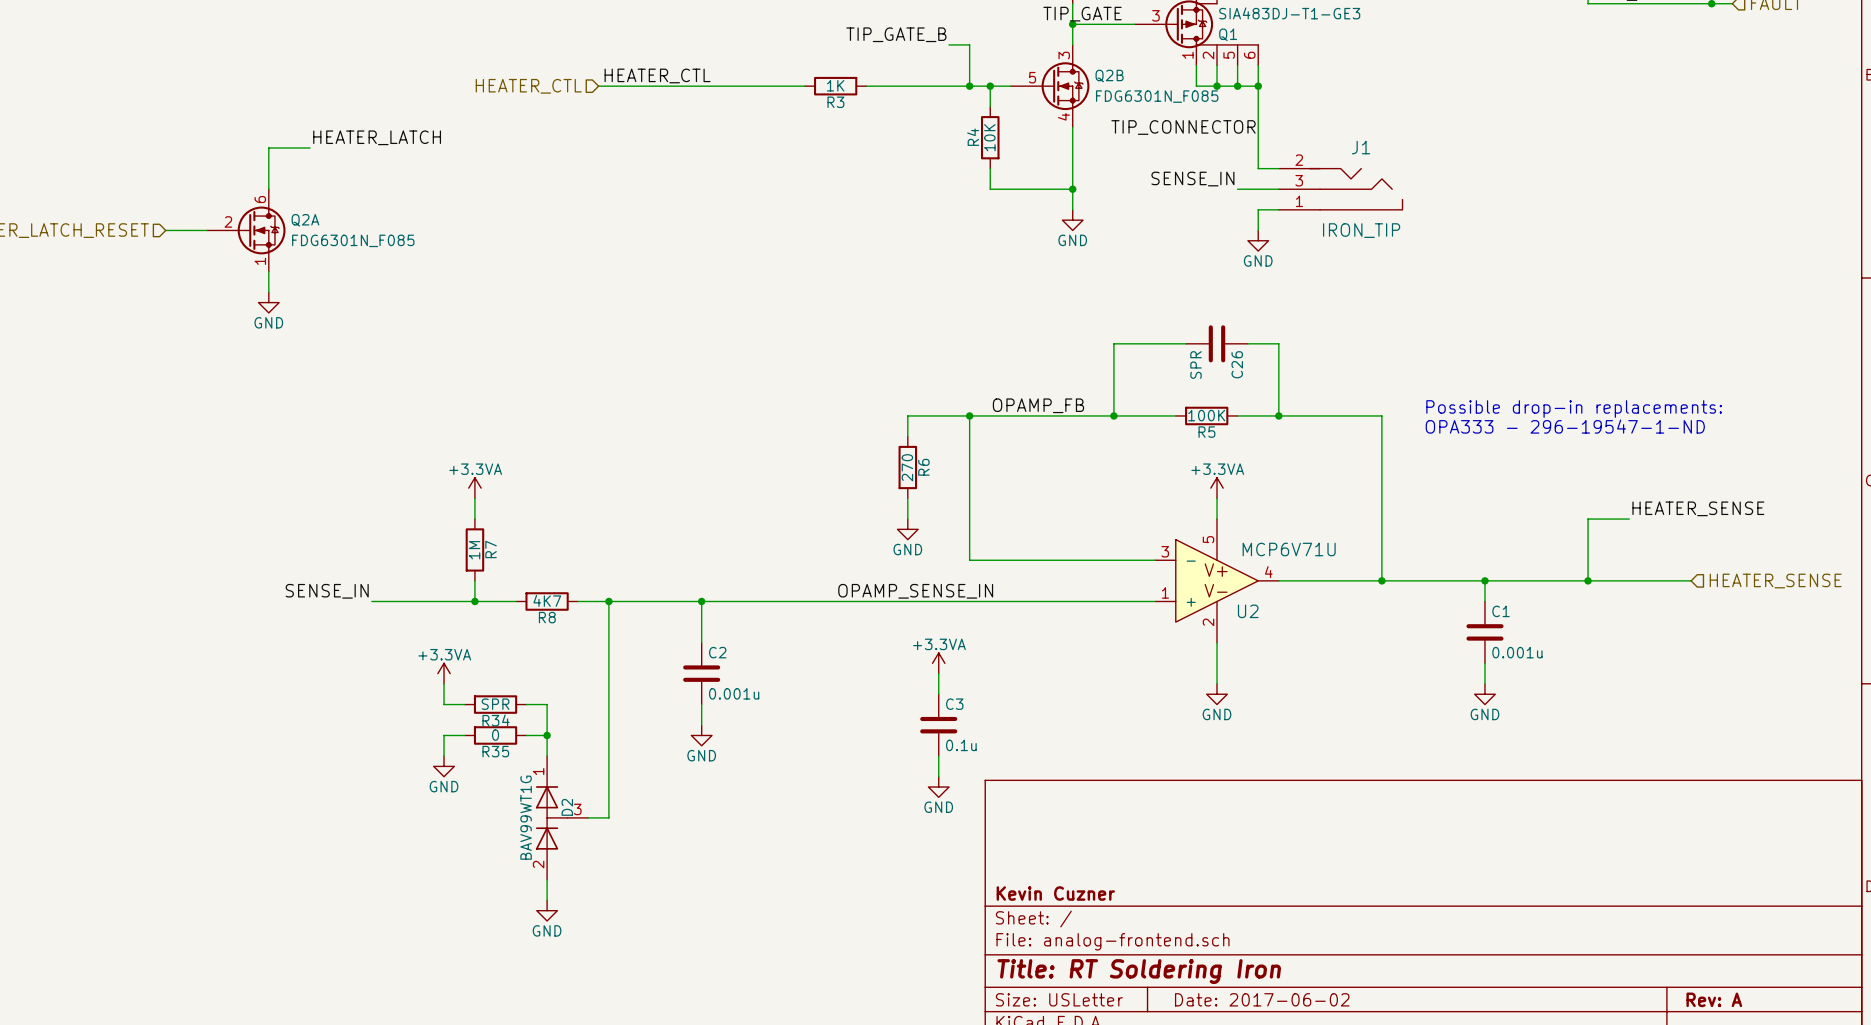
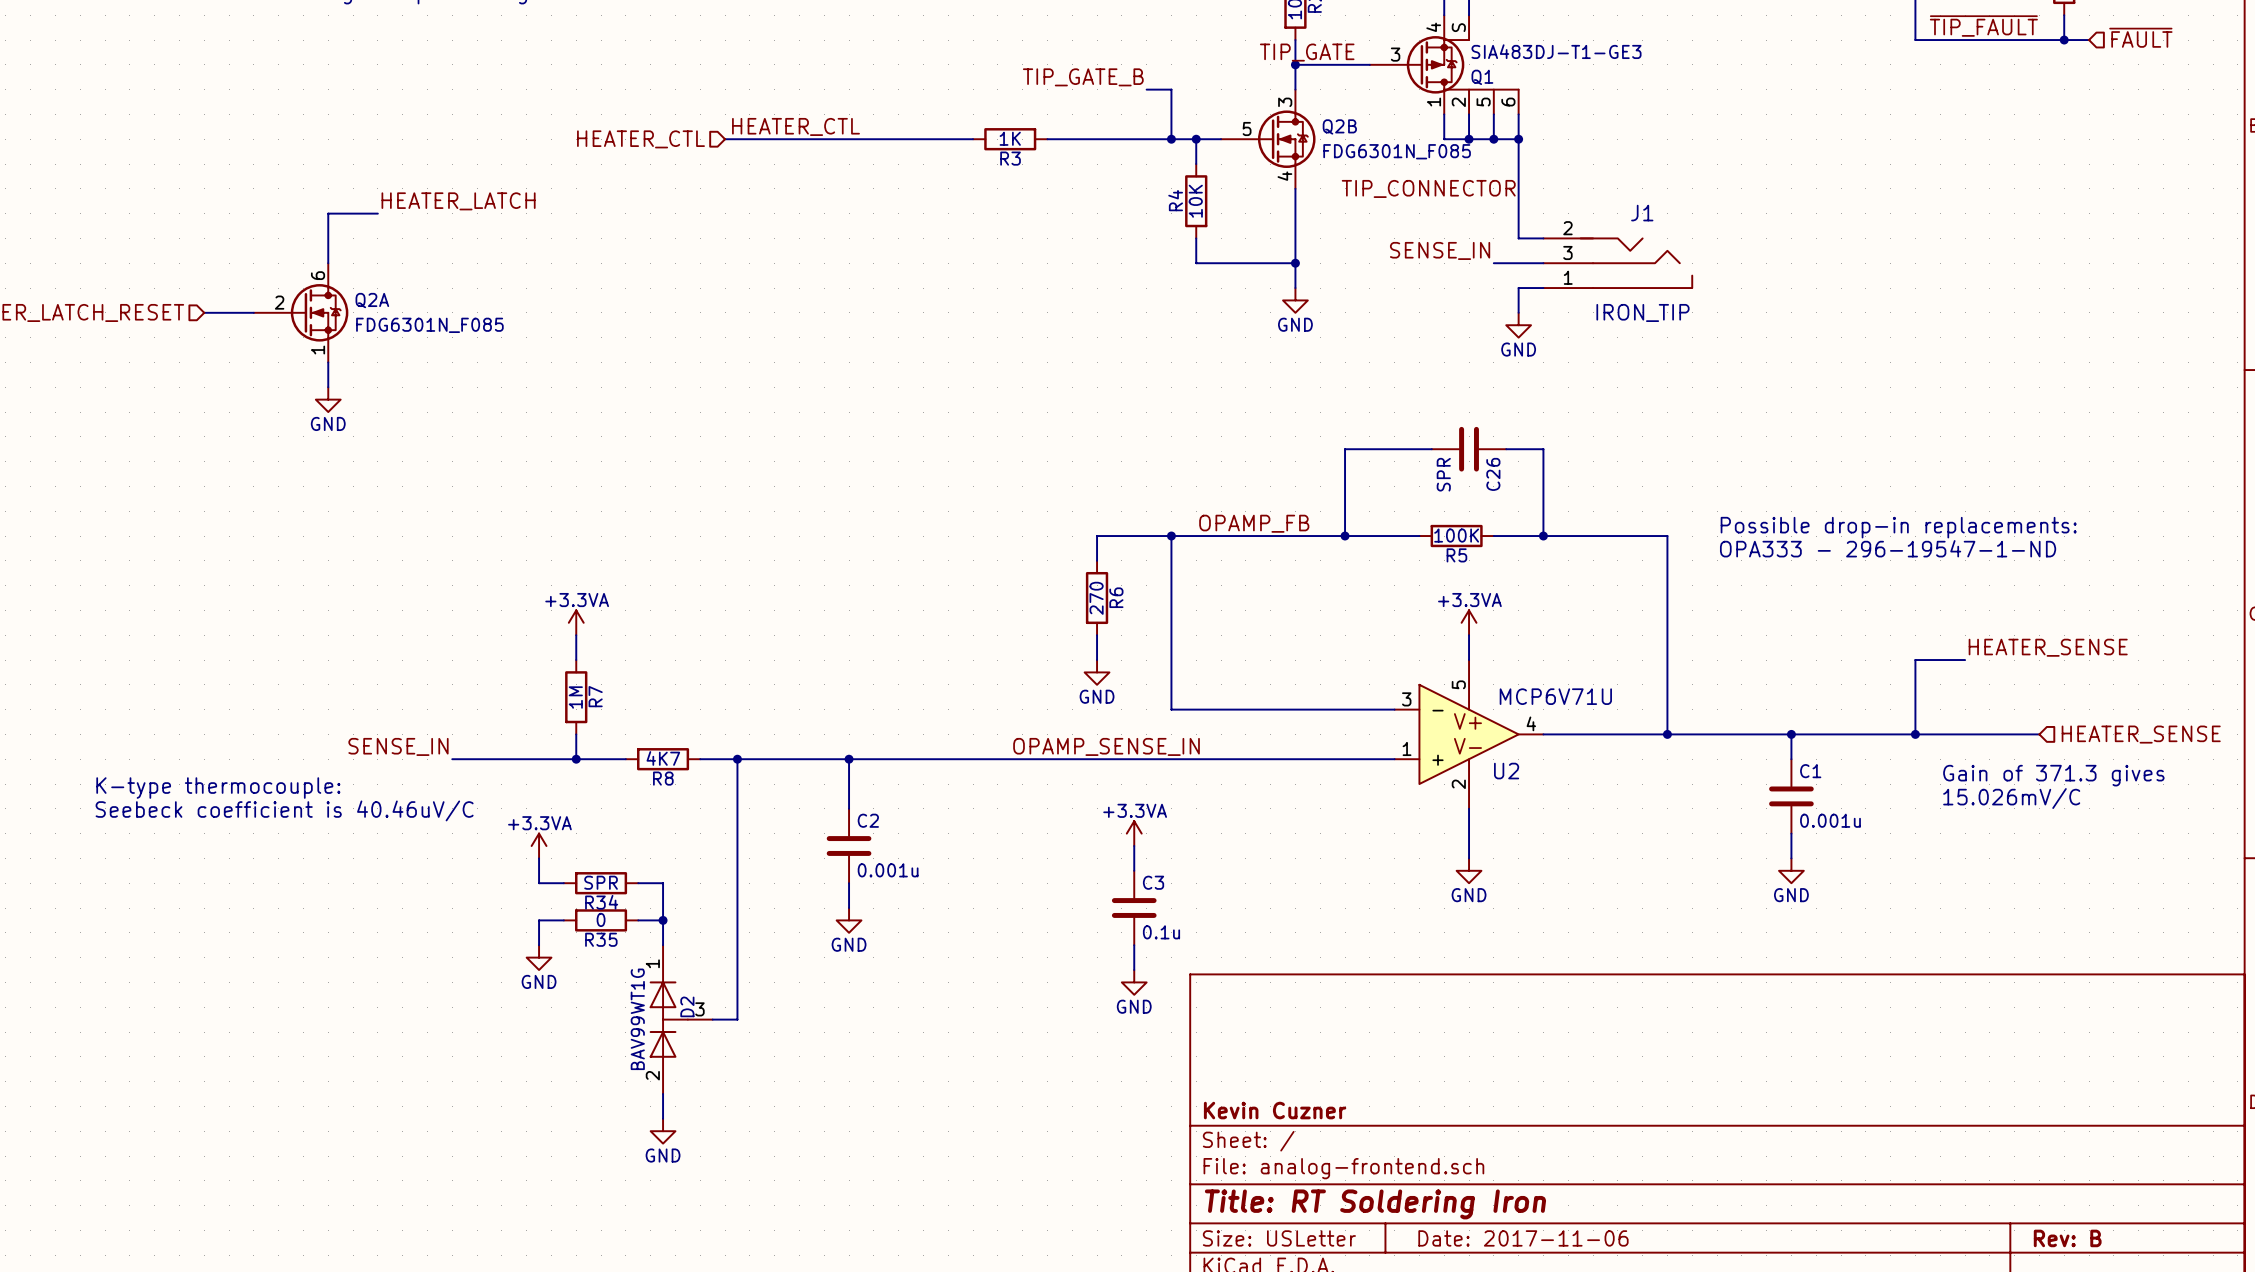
text: none -> Gain of 371.3 gives (2053, 775)
text: none -> K-type thermocouple: (218, 788)
text: none -> 15.026mV/C (2011, 798)
text: none -> Seebeck coefficient is 40.46uV/C (284, 810)
title block: Date: 2017-06-02 (1262, 999) -> Date: 2017-11-06 (1523, 1238)
title block: Rev: A (1714, 999) -> Rev: B (2067, 1238)

